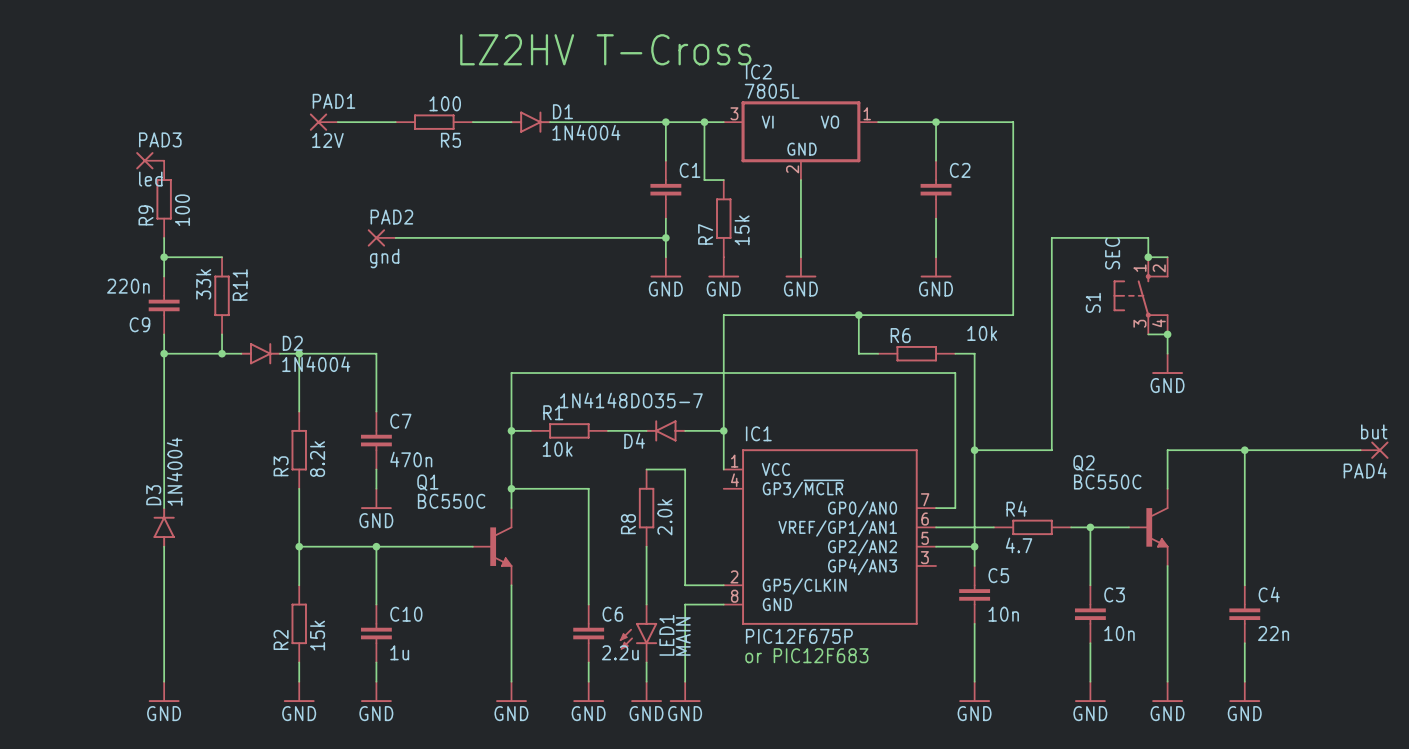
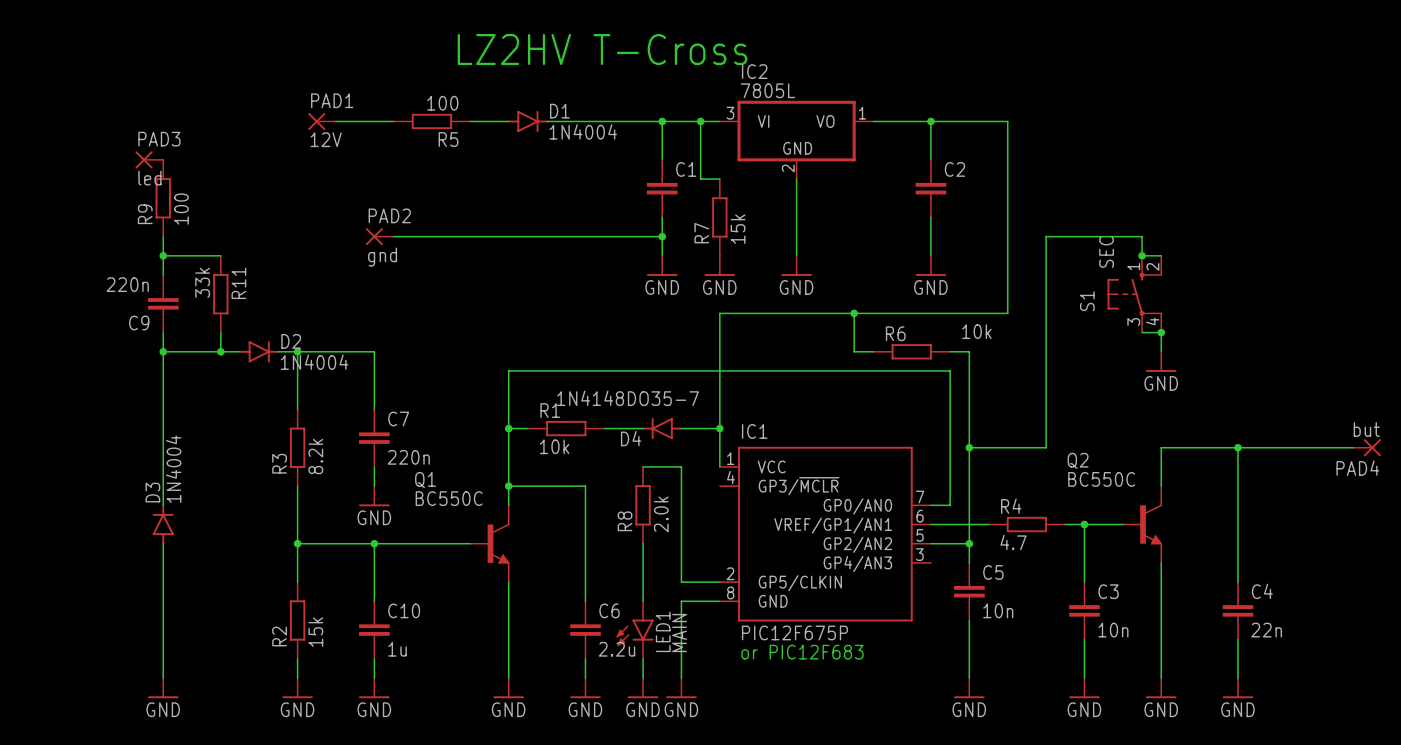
C7 value: 470n (411, 459) -> 220n (408, 457)

